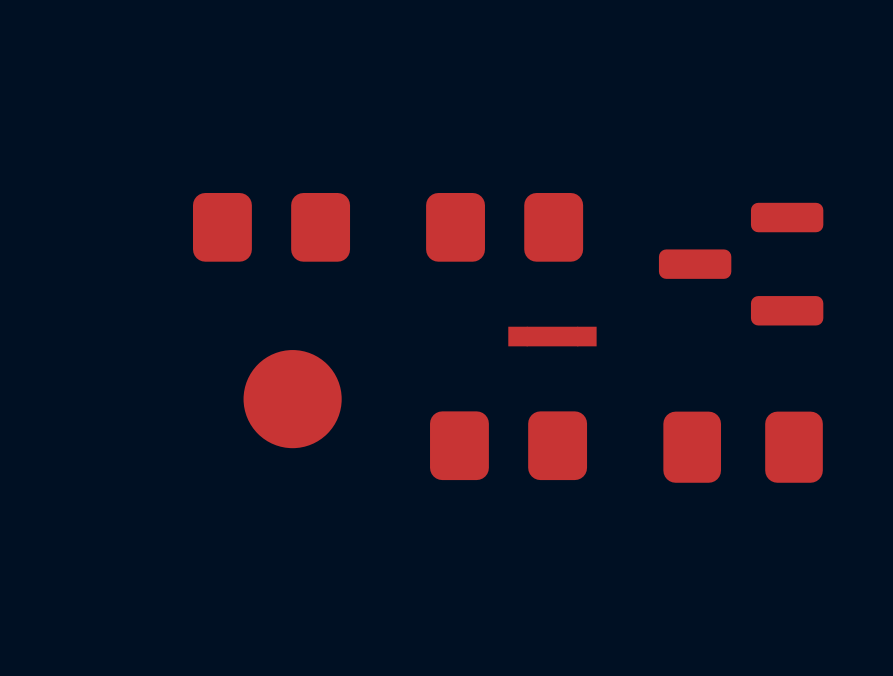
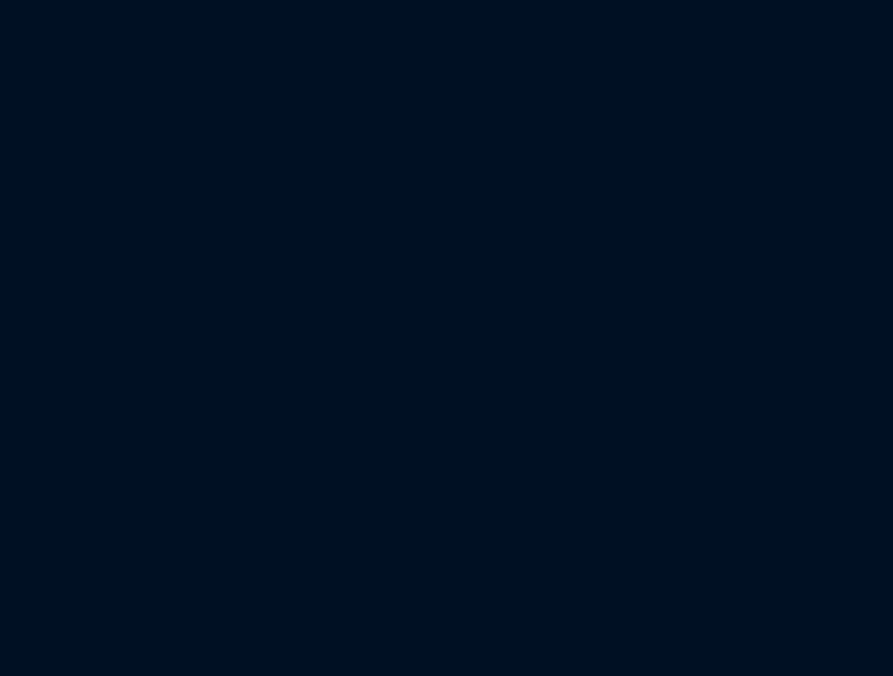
part: (271, 227) -> none
part: (504, 227) -> none
part: (741, 264) -> none
part: (552, 336) -> none
part: (292, 399) -> none
part: (508, 445) -> none
part: (743, 447) -> none

